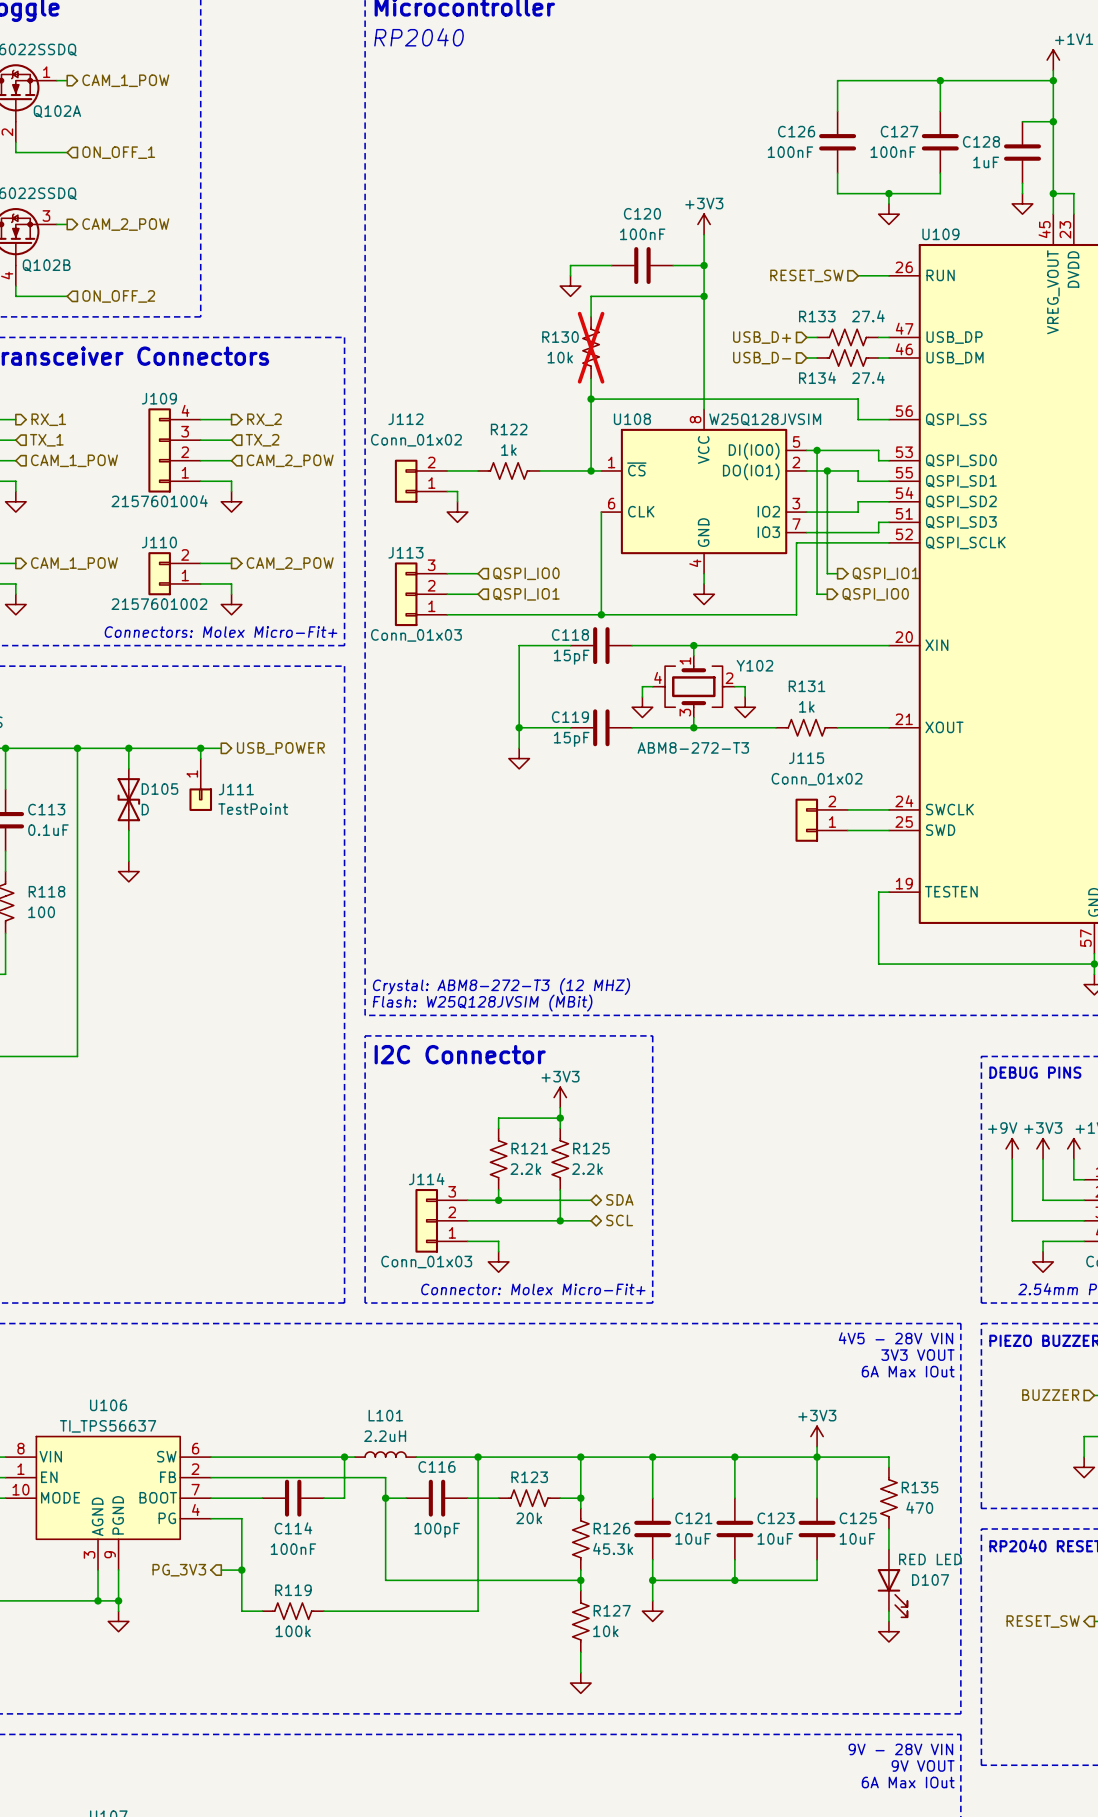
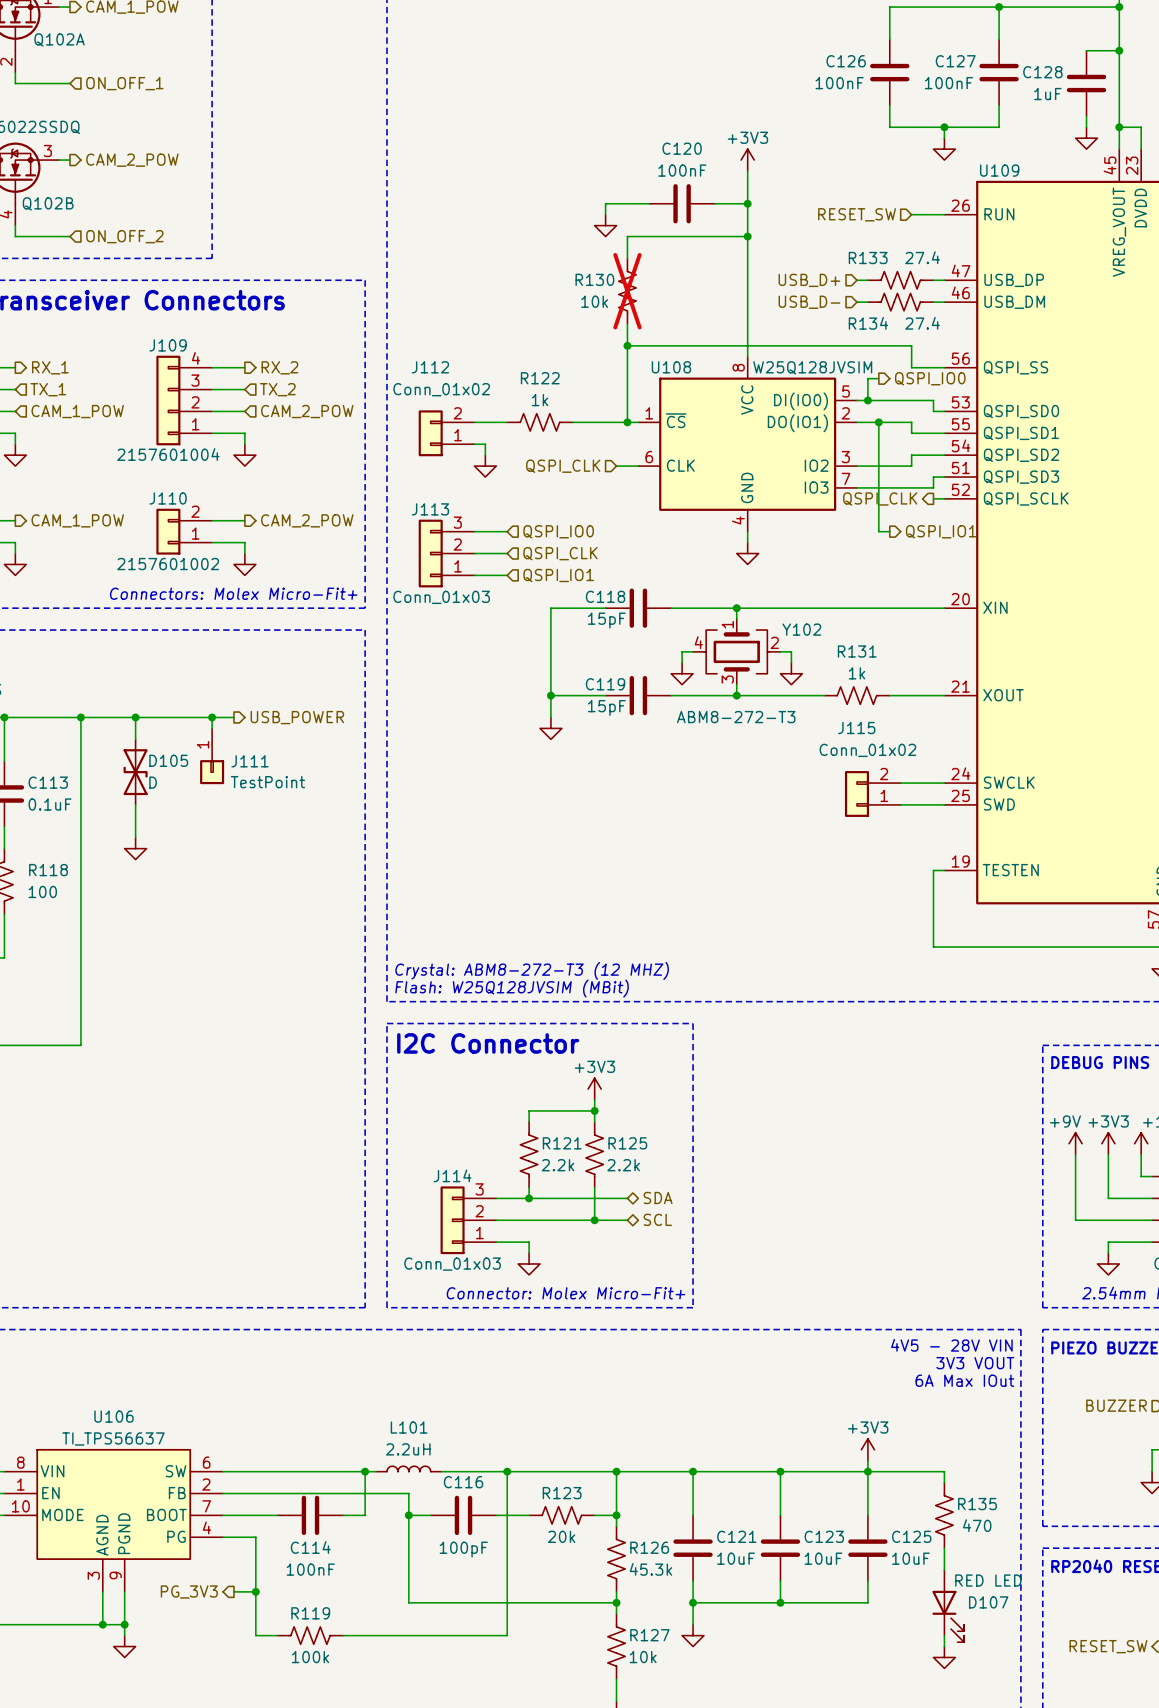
wire: (817, 450) (817, 594) (827, 594) -> (867, 400) (867, 378) (878, 378)
hierarchical label: none -> QSPI_CLK (563, 466)
wire: (601, 512) (601, 614) -> (638, 466) (616, 466)
hierarchical label: none -> QSPI_CLK (880, 498)
wire: (878, 542) (796, 542) (796, 614) (478, 614) -> none
hierarchical label: QSPI_IO1 (526, 594) -> QSPI_CLK (560, 553)
hierarchical label position: QSPI_IO0 (875, 594) -> QSPI_IO0 (930, 378)
hierarchical label: none -> QSPI_IO1 (558, 575)
junction: (601, 614) -> none

